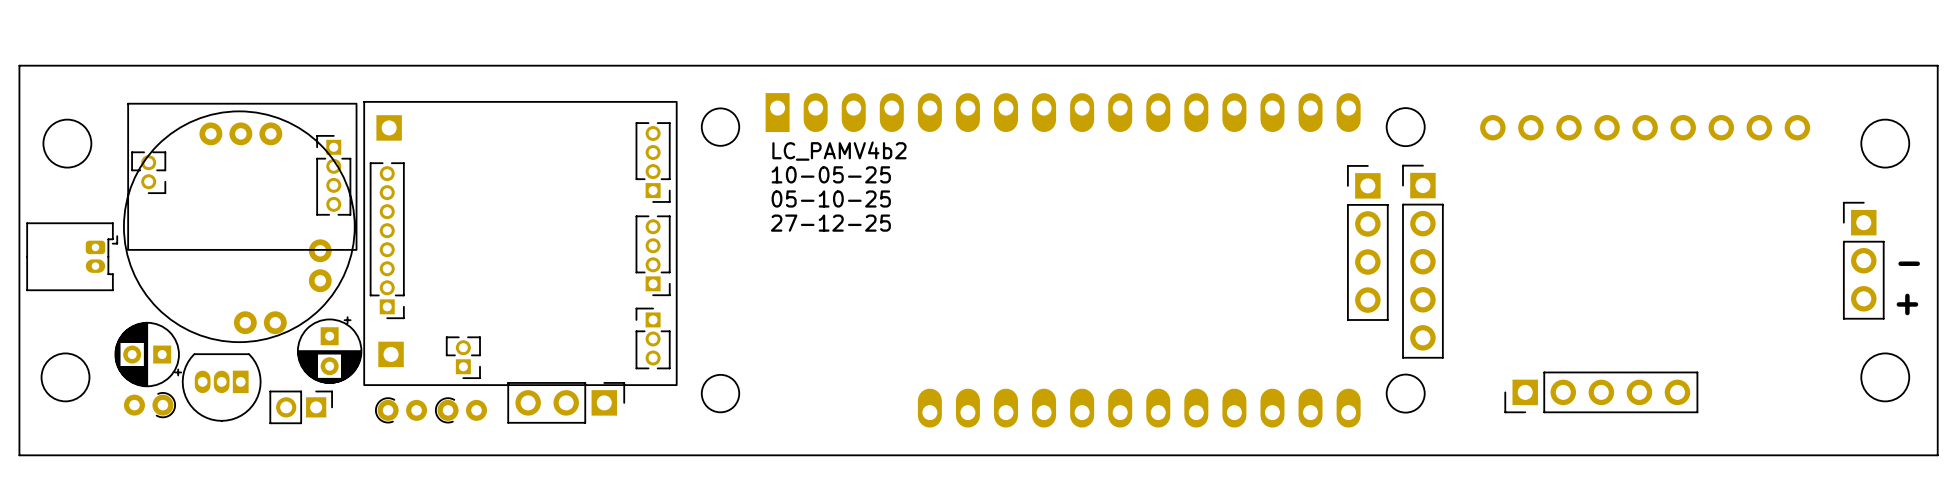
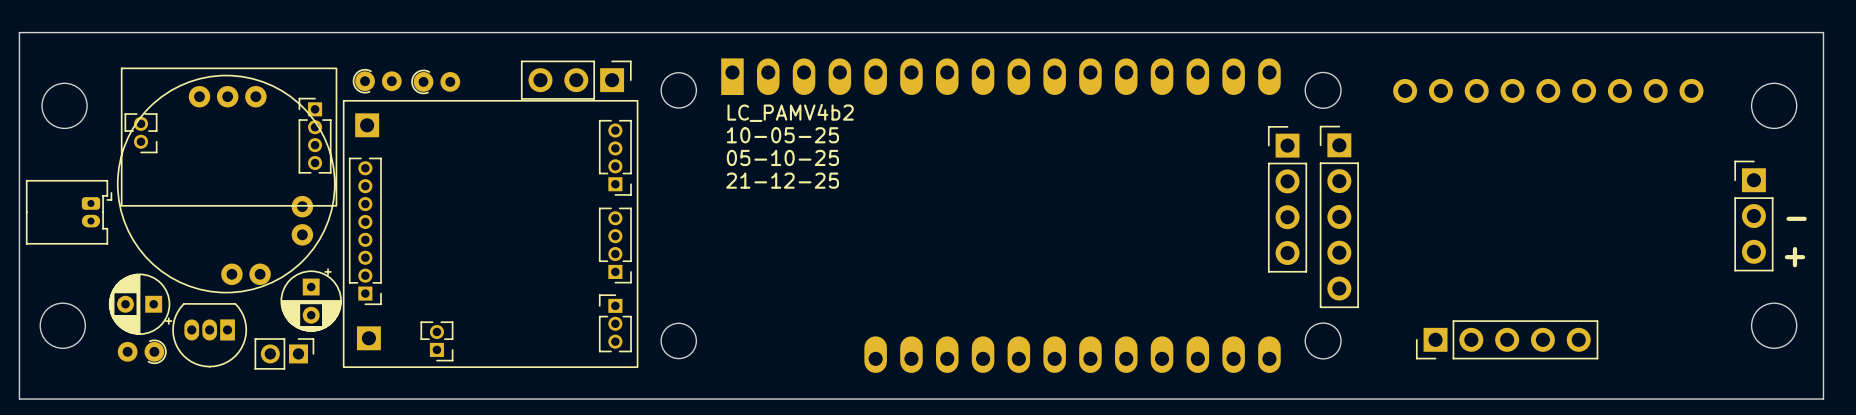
part: none -> (377, 81)
part: none -> (435, 81)
text: 27-12-25 (830, 223) -> 21-12-25 (782, 180)
part position: (520, 243) -> (490, 233)
part position: (566, 402) -> (576, 80)
part: (401, 410) -> none
part: (460, 410) -> none

